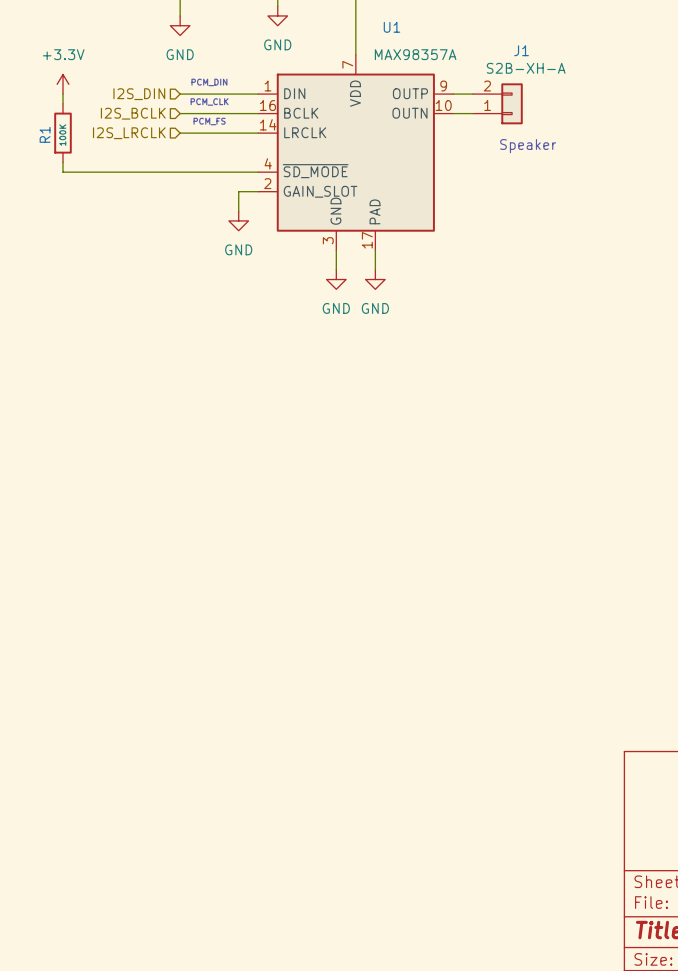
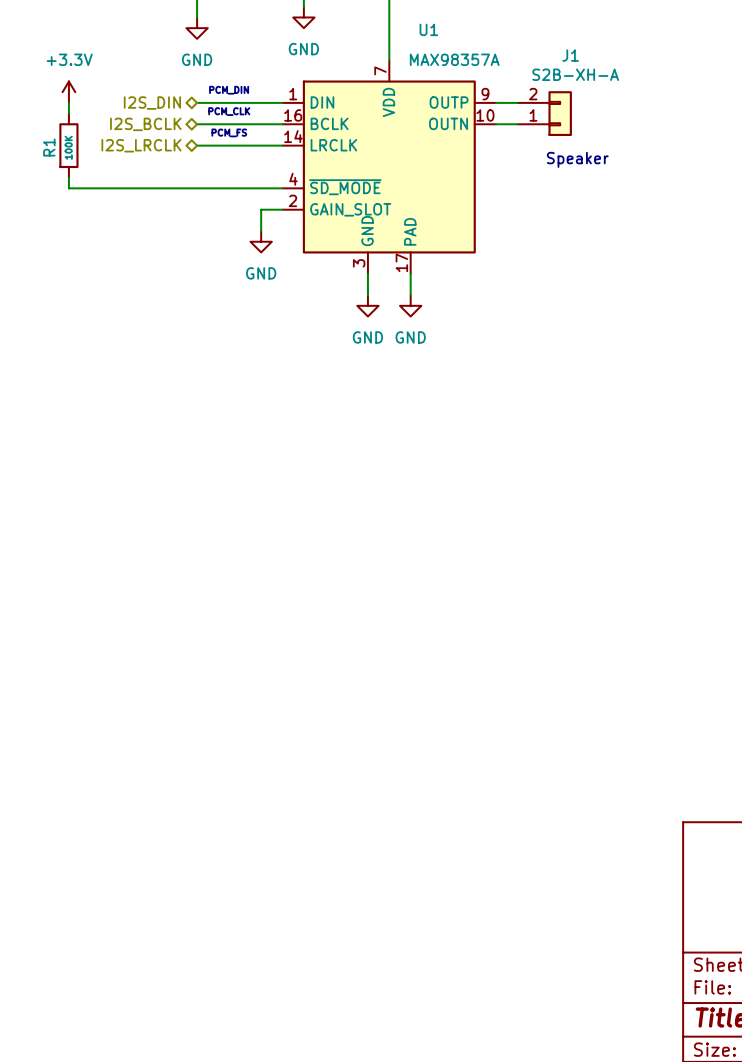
hierarchical label shape: input (139, 94) -> bidirectional (152, 103)
hierarchical label shape: input (133, 113) -> bidirectional (145, 124)
hierarchical label shape: input (129, 133) -> bidirectional (141, 145)

